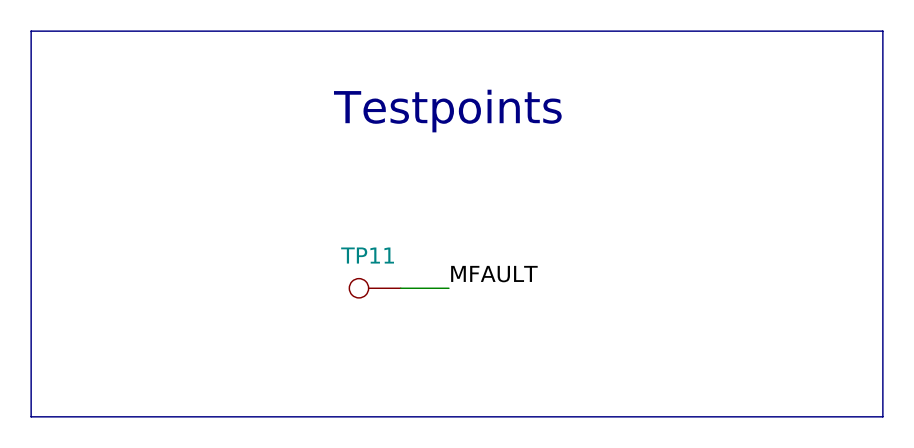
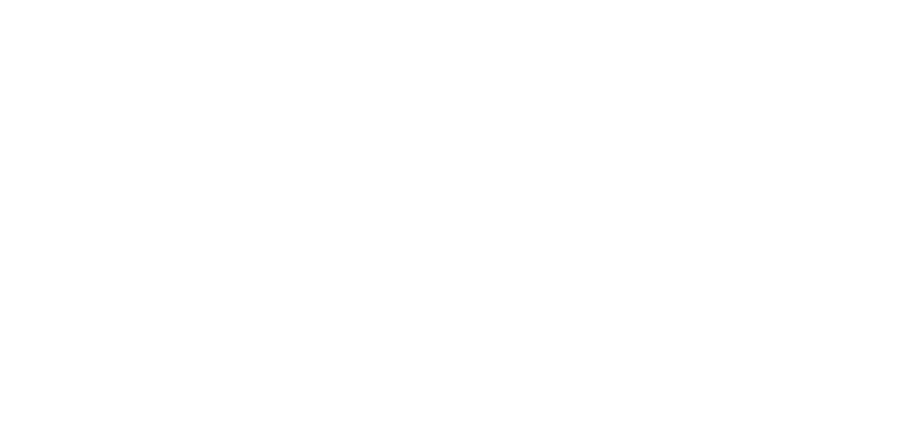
line: (31, 31) (882, 31) (882, 416) (31, 416) (31, 31) -> none
text: Testpoints (447, 111) -> none
label: MFAULT (494, 274) -> none
TP11: (375, 288) -> none
wire: (400, 288) (448, 288) -> none

